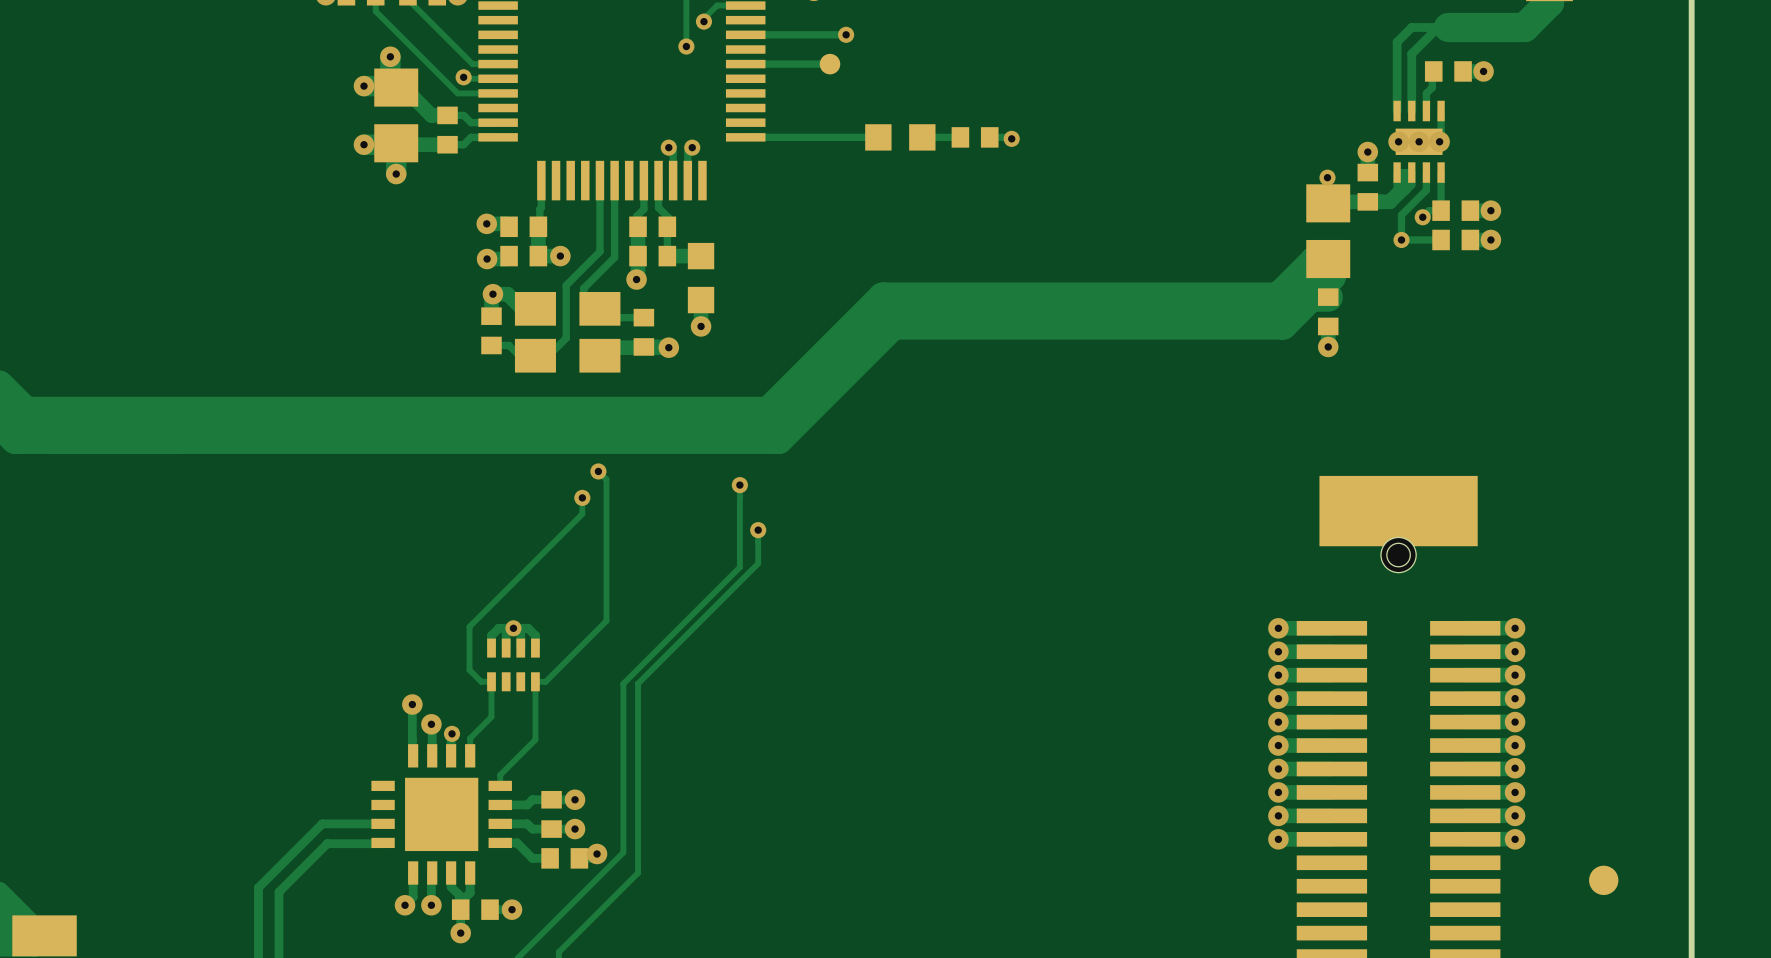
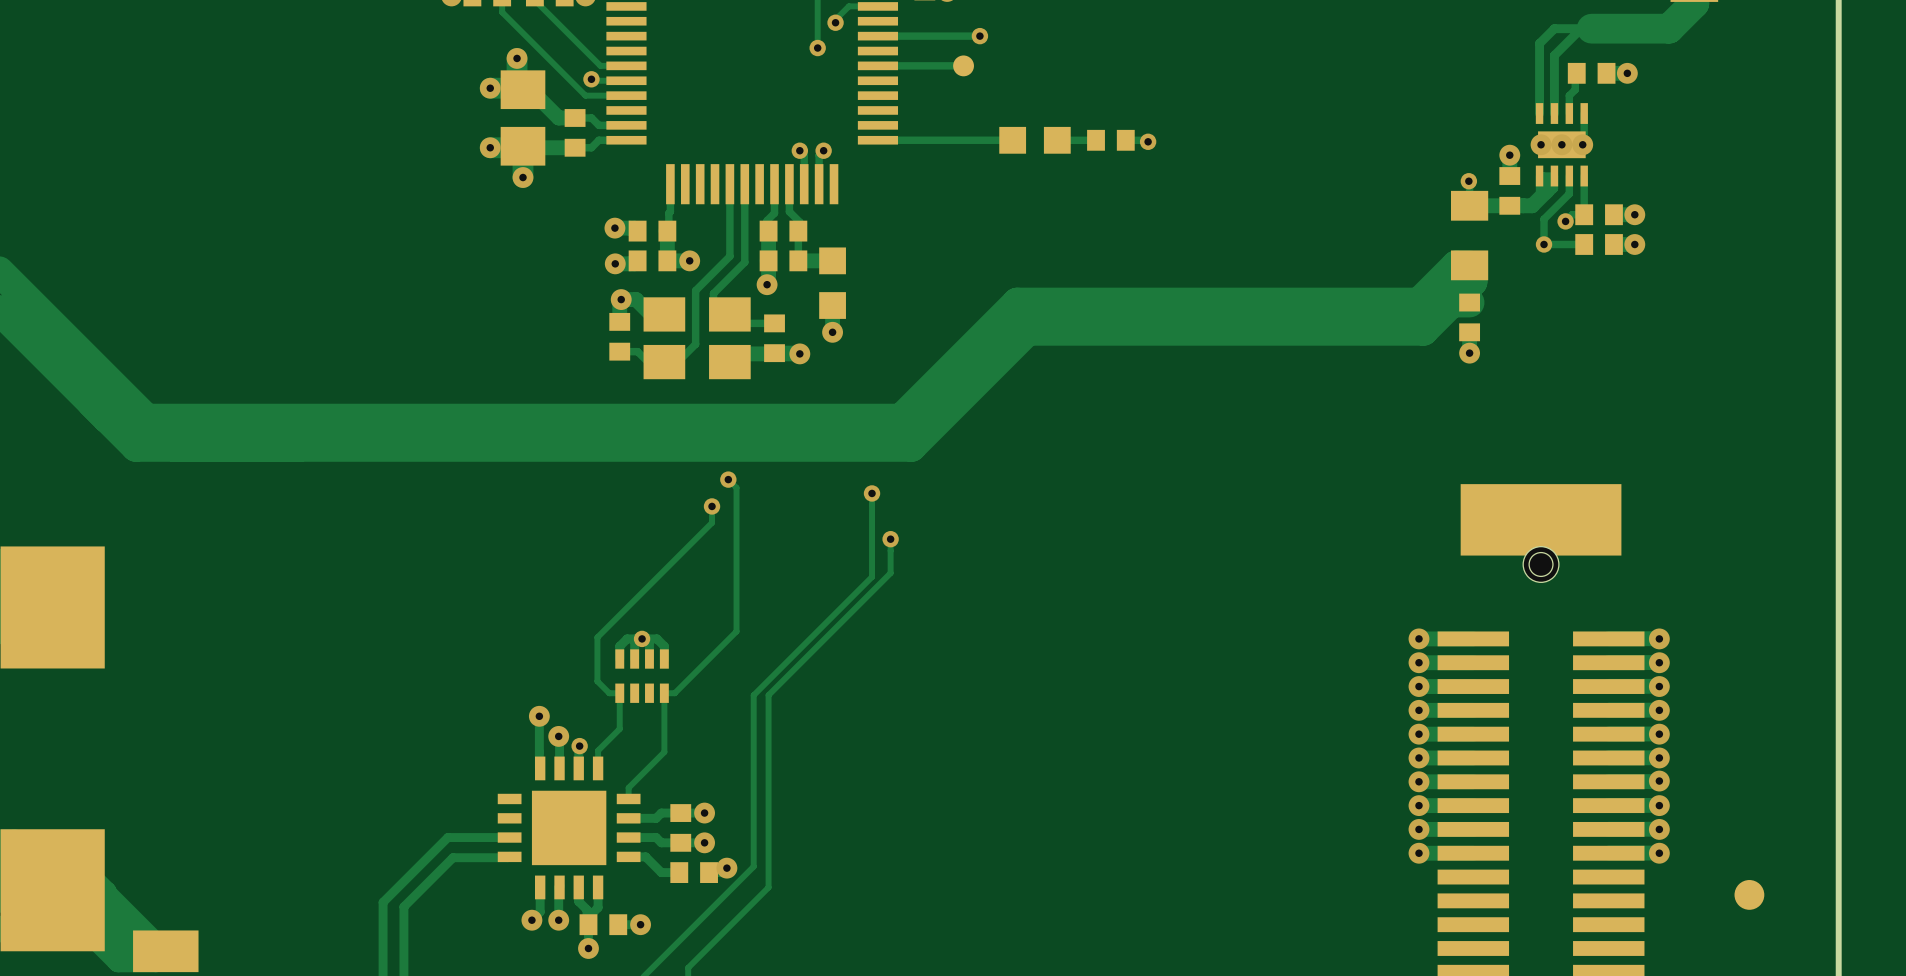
part footprint: [1306, 184, 1351, 279] -> [1451, 190, 1489, 281]

